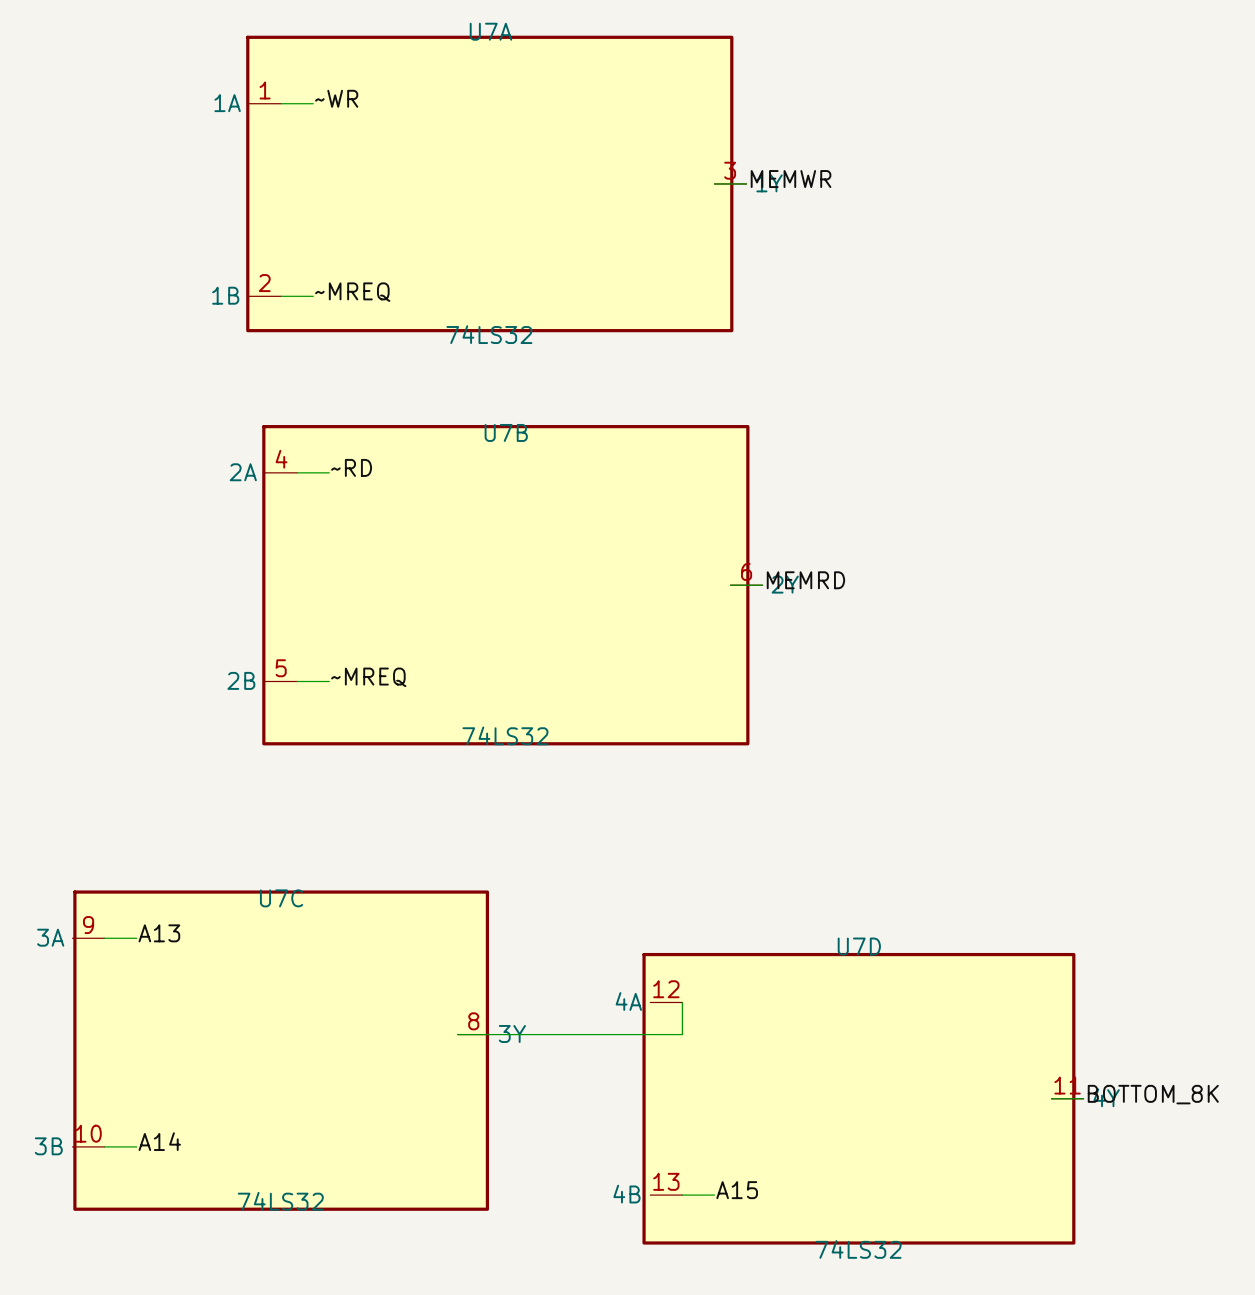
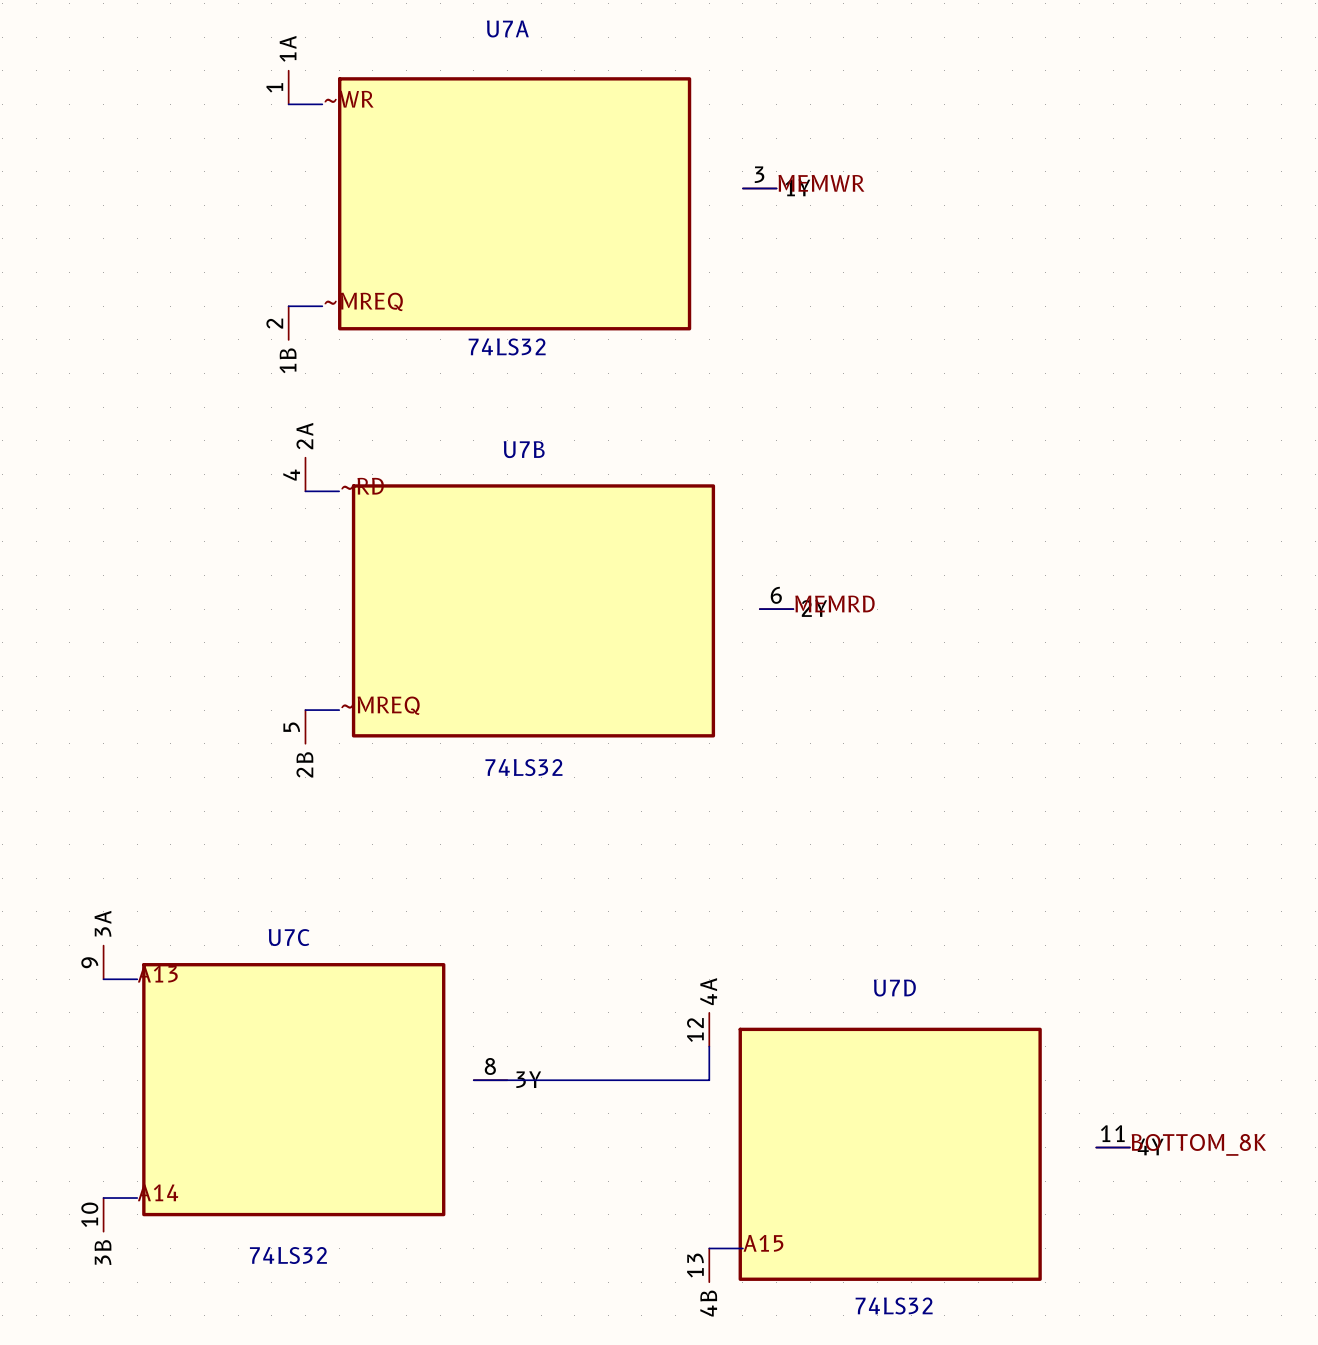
U7A symbol: [246, 35, 747, 333] -> [288, 70, 777, 340]
U7B symbol: [262, 425, 763, 746] -> [305, 457, 794, 744]
U7C symbol: [72, 890, 490, 1211] -> [103, 945, 508, 1232]
U7D symbol: [642, 952, 1084, 1245] -> [709, 1012, 1130, 1283]

